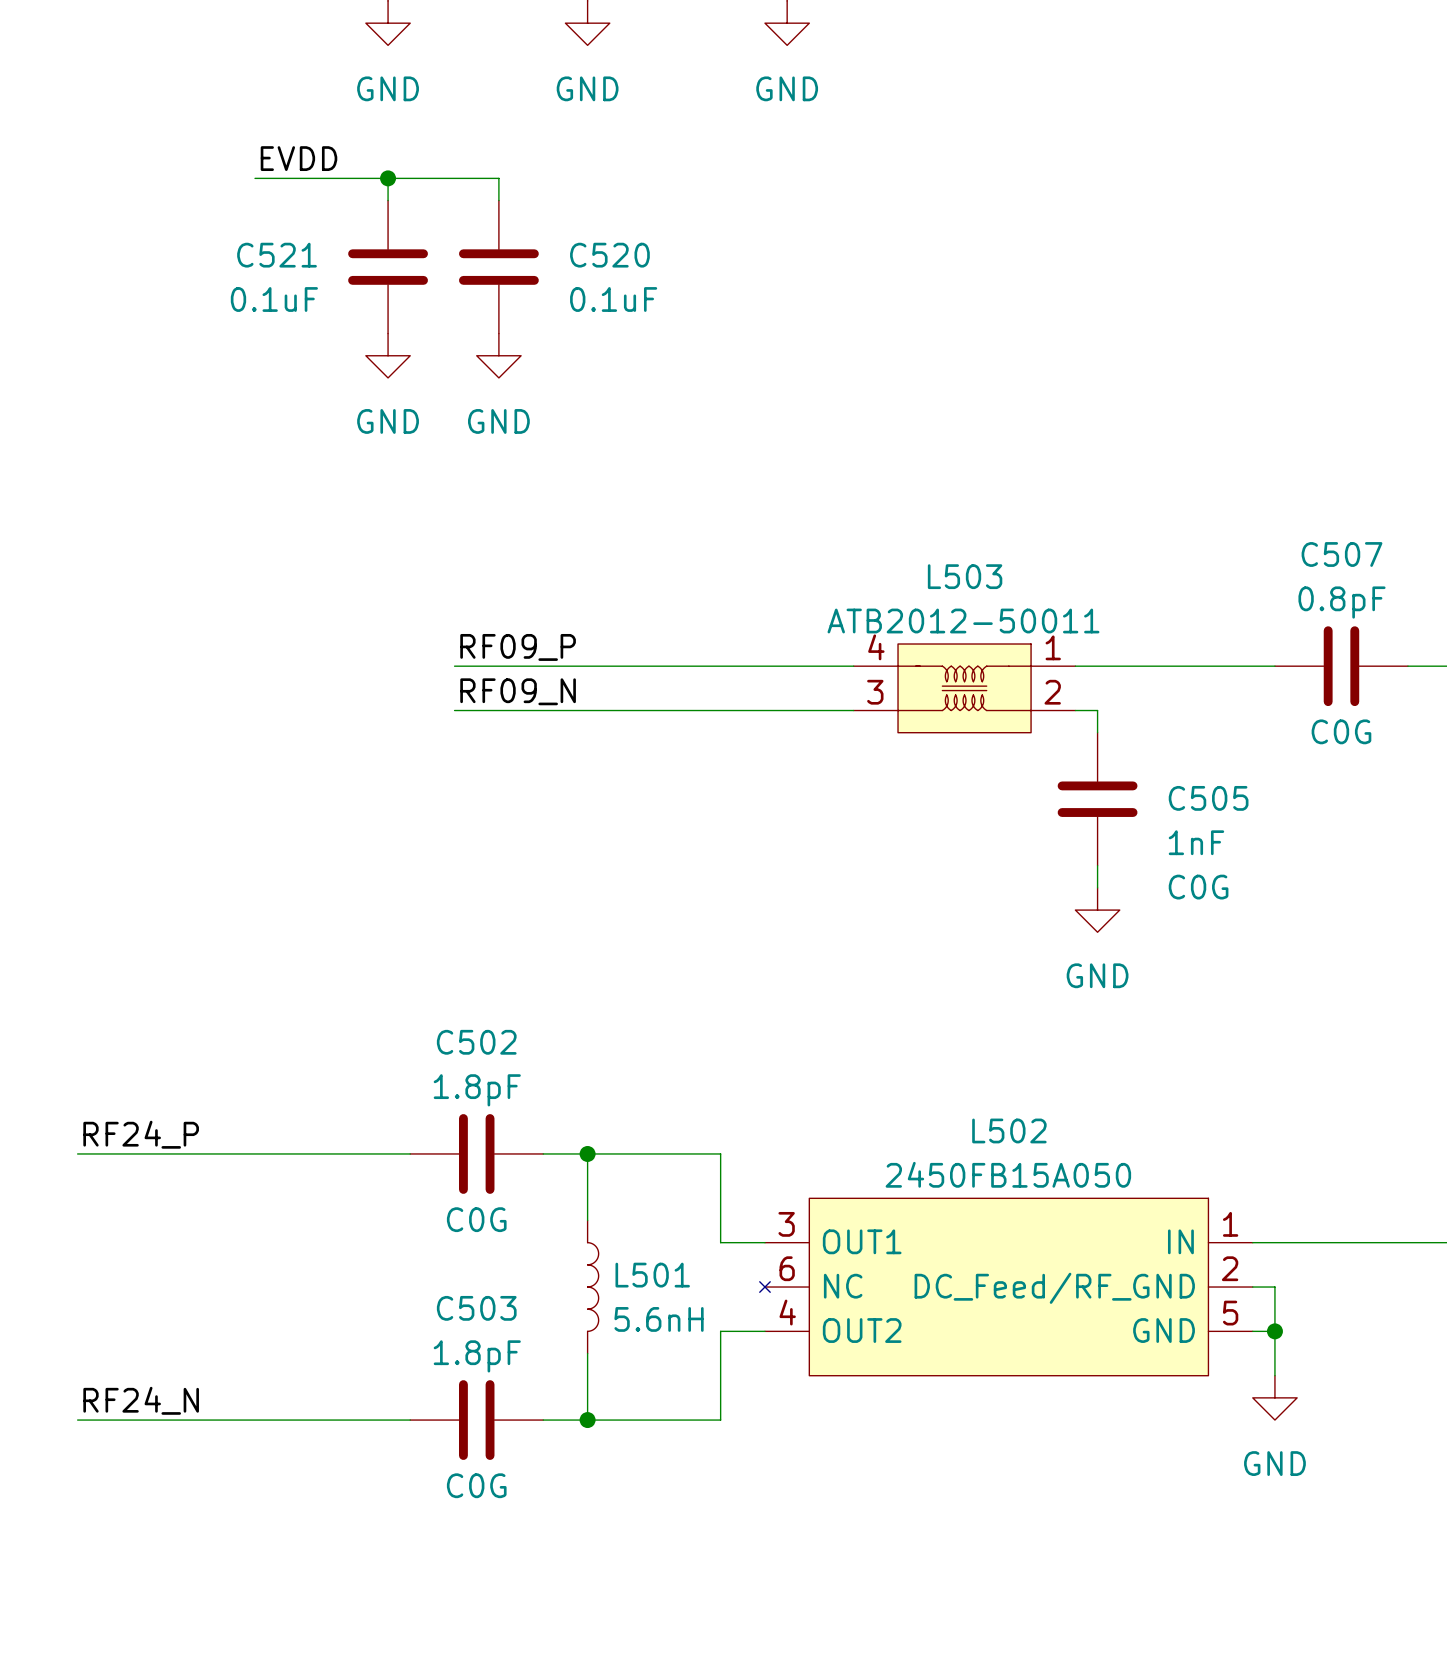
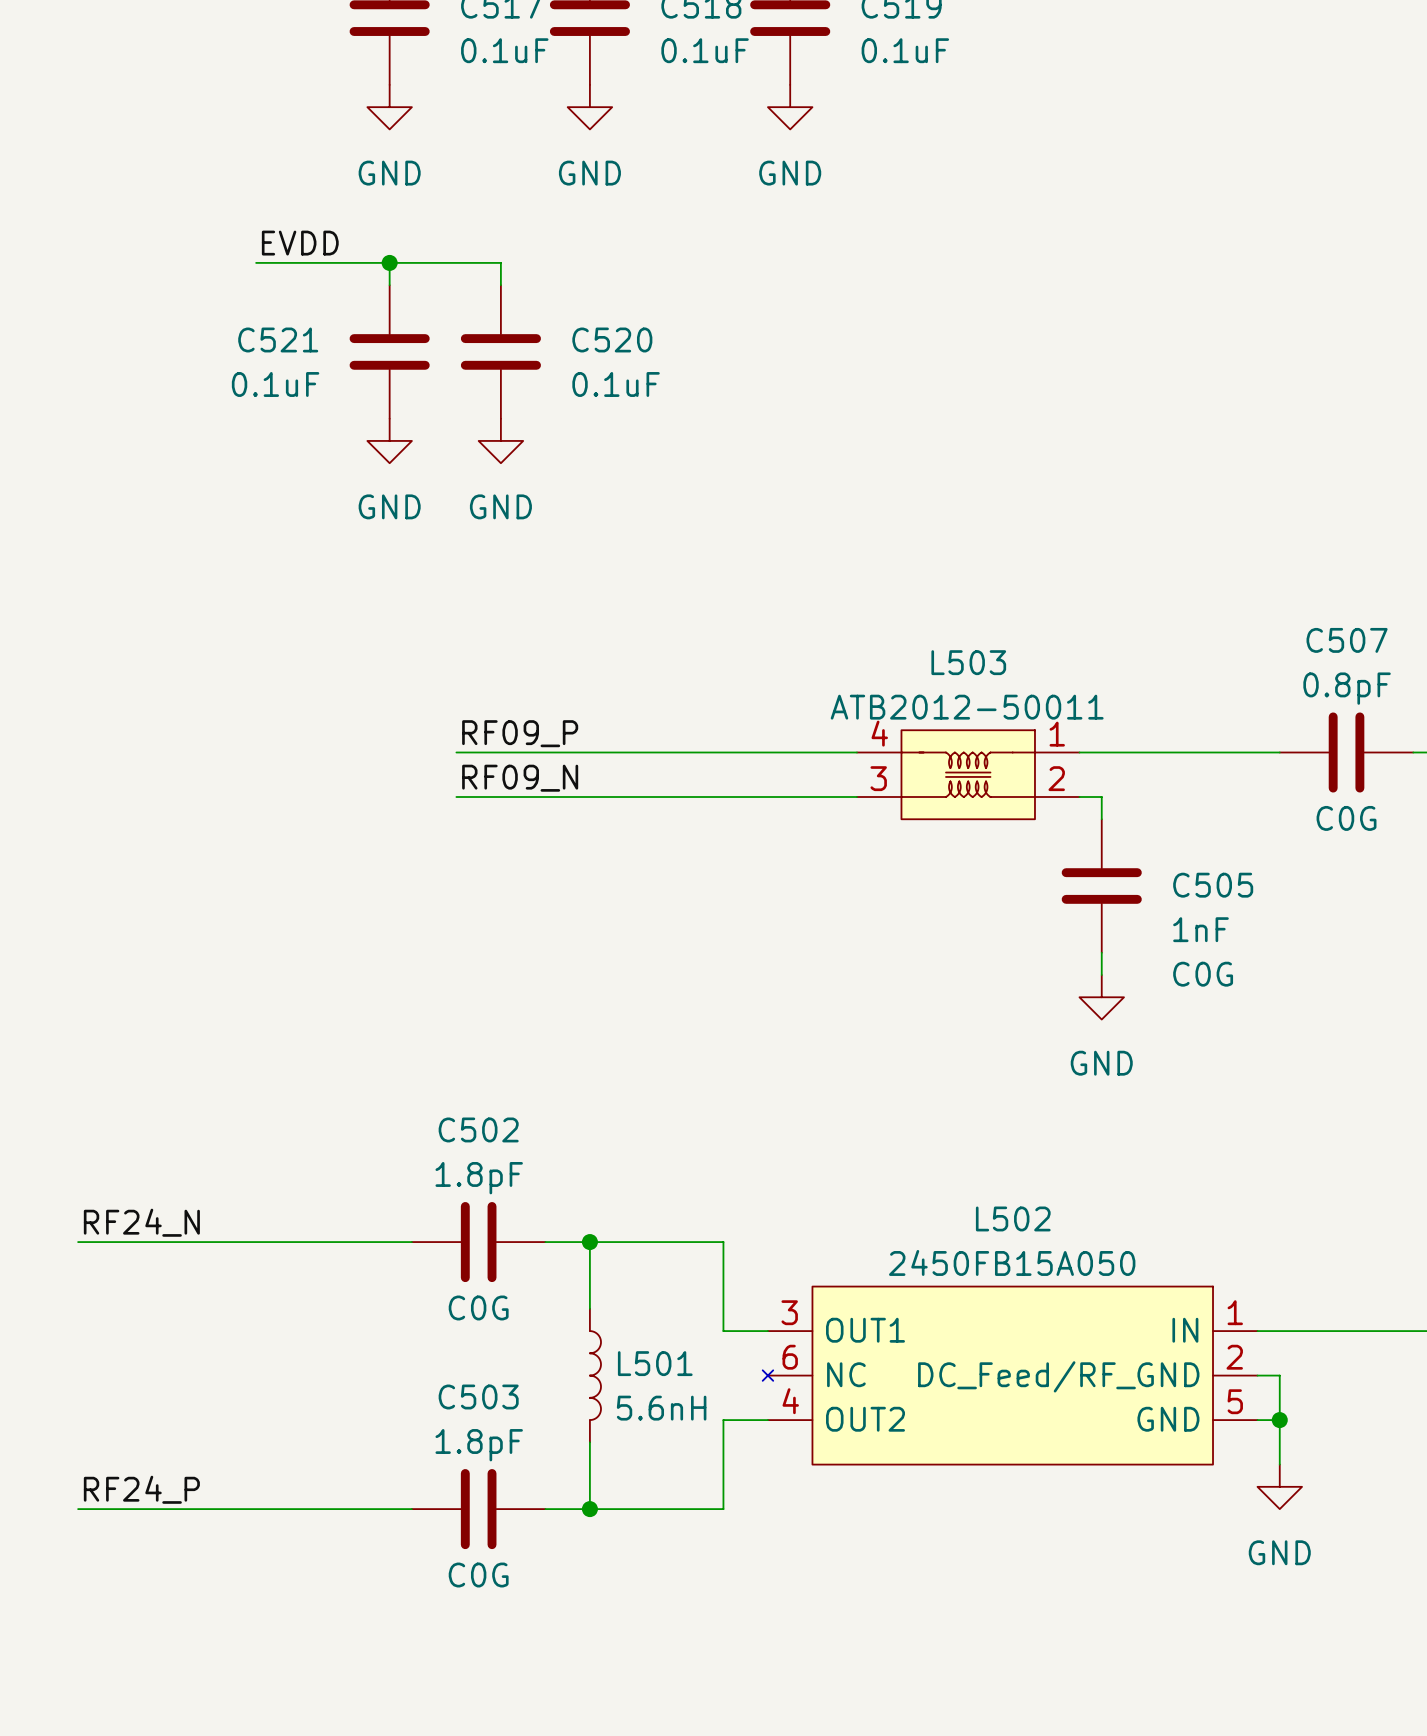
label: RF24_P (141, 1134) -> RF24_N (141, 1222)
label: RF24_N (141, 1400) -> RF24_P (141, 1489)

